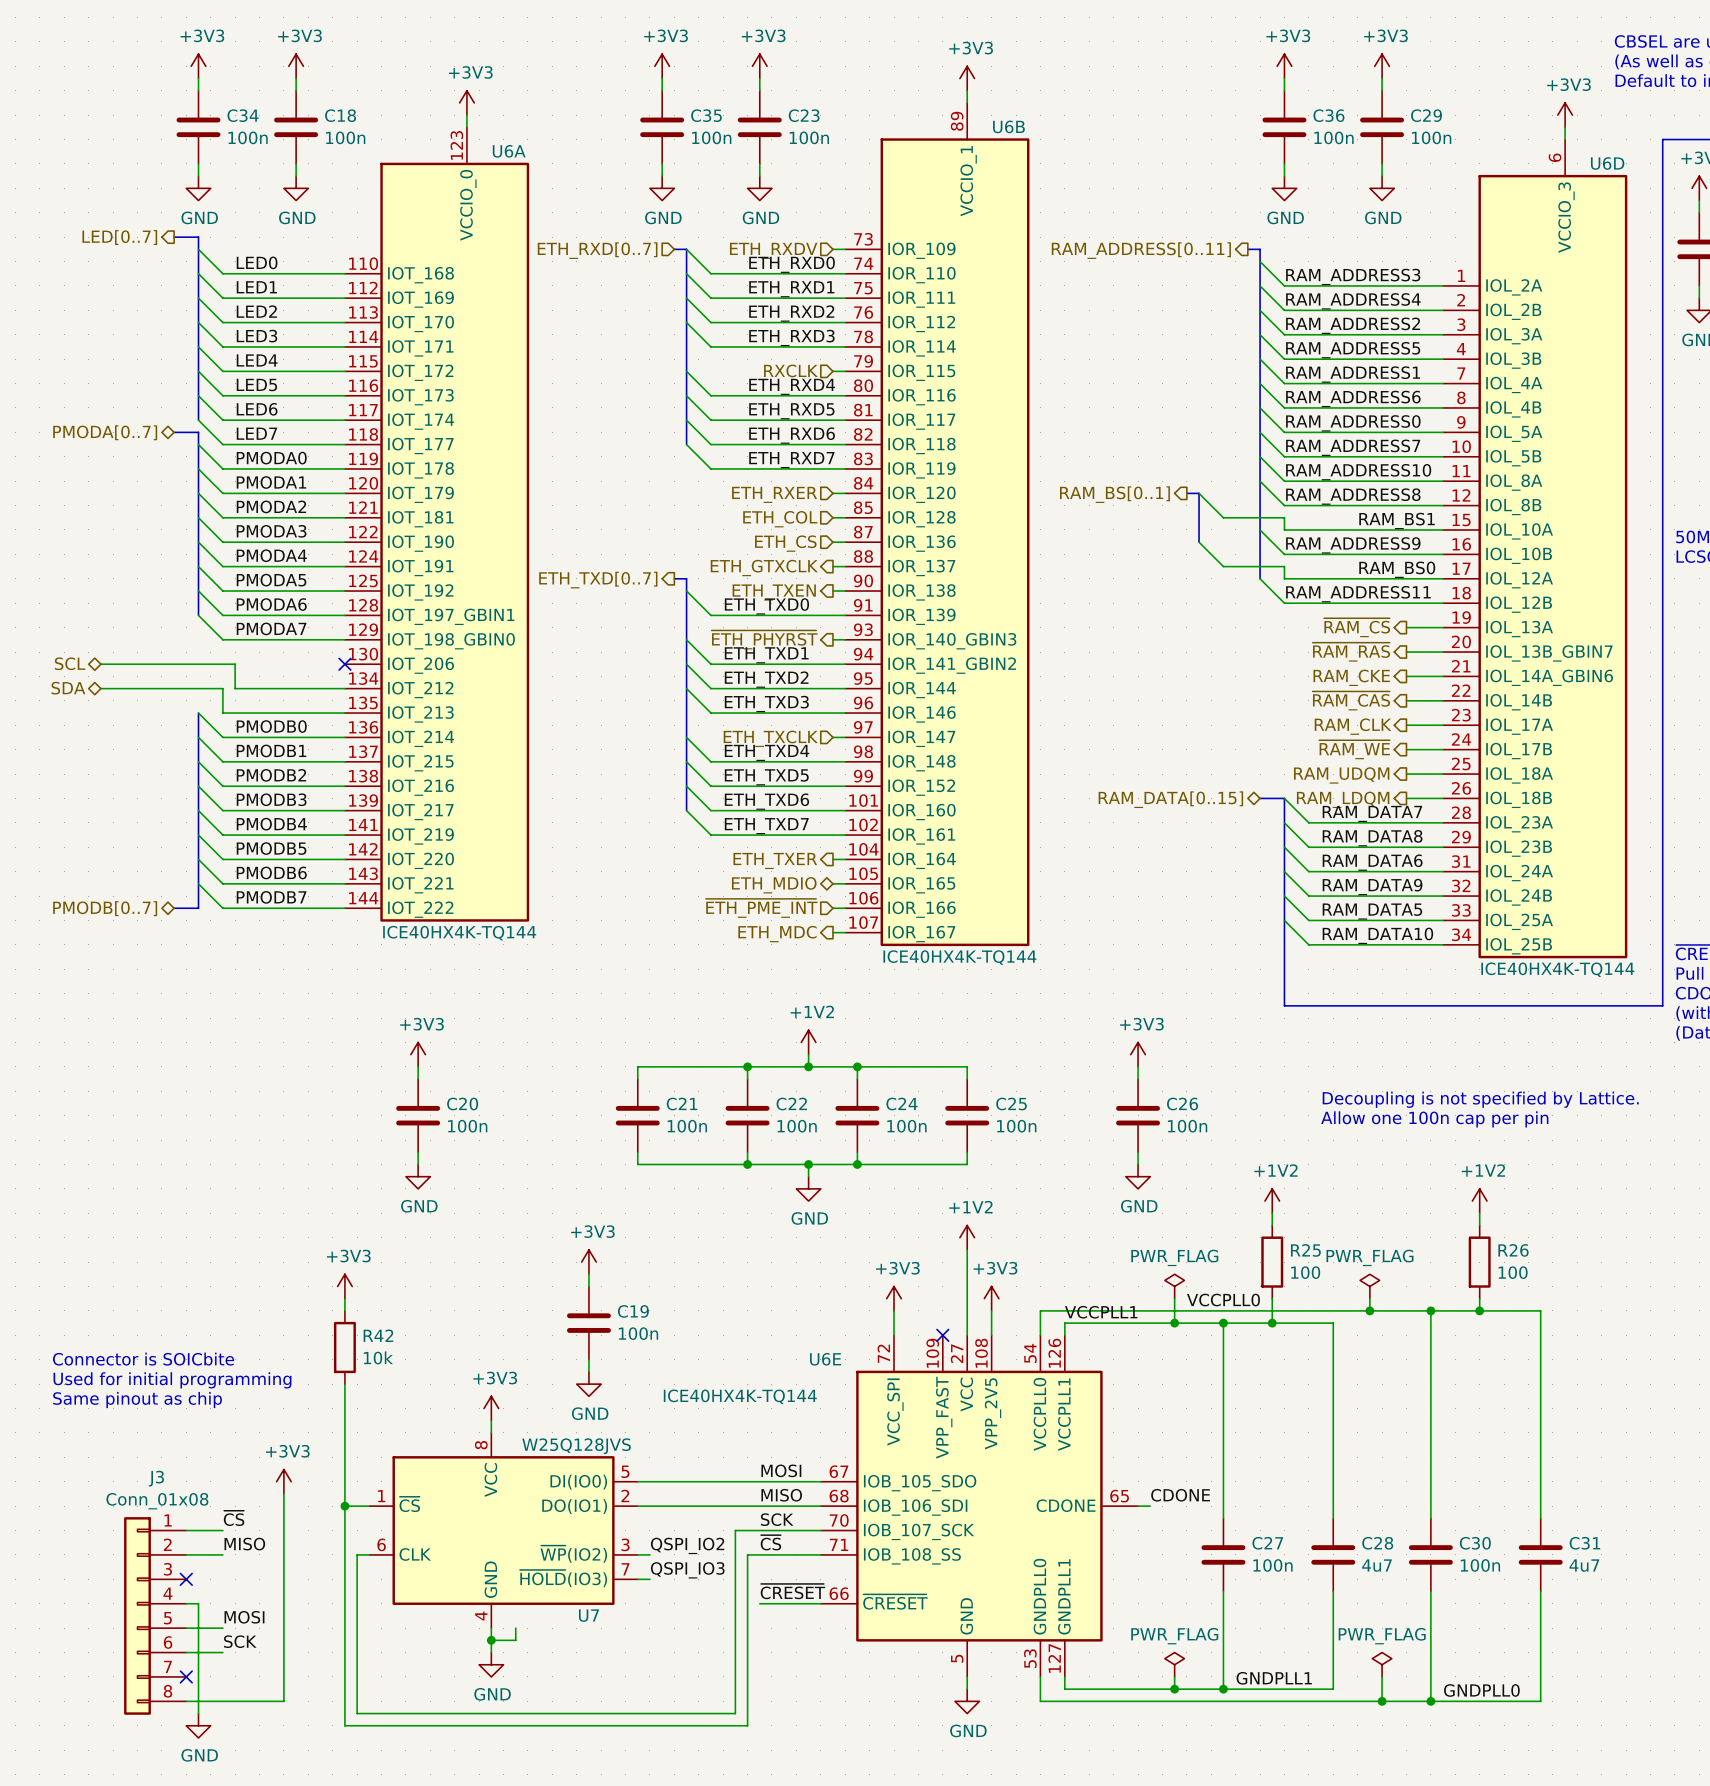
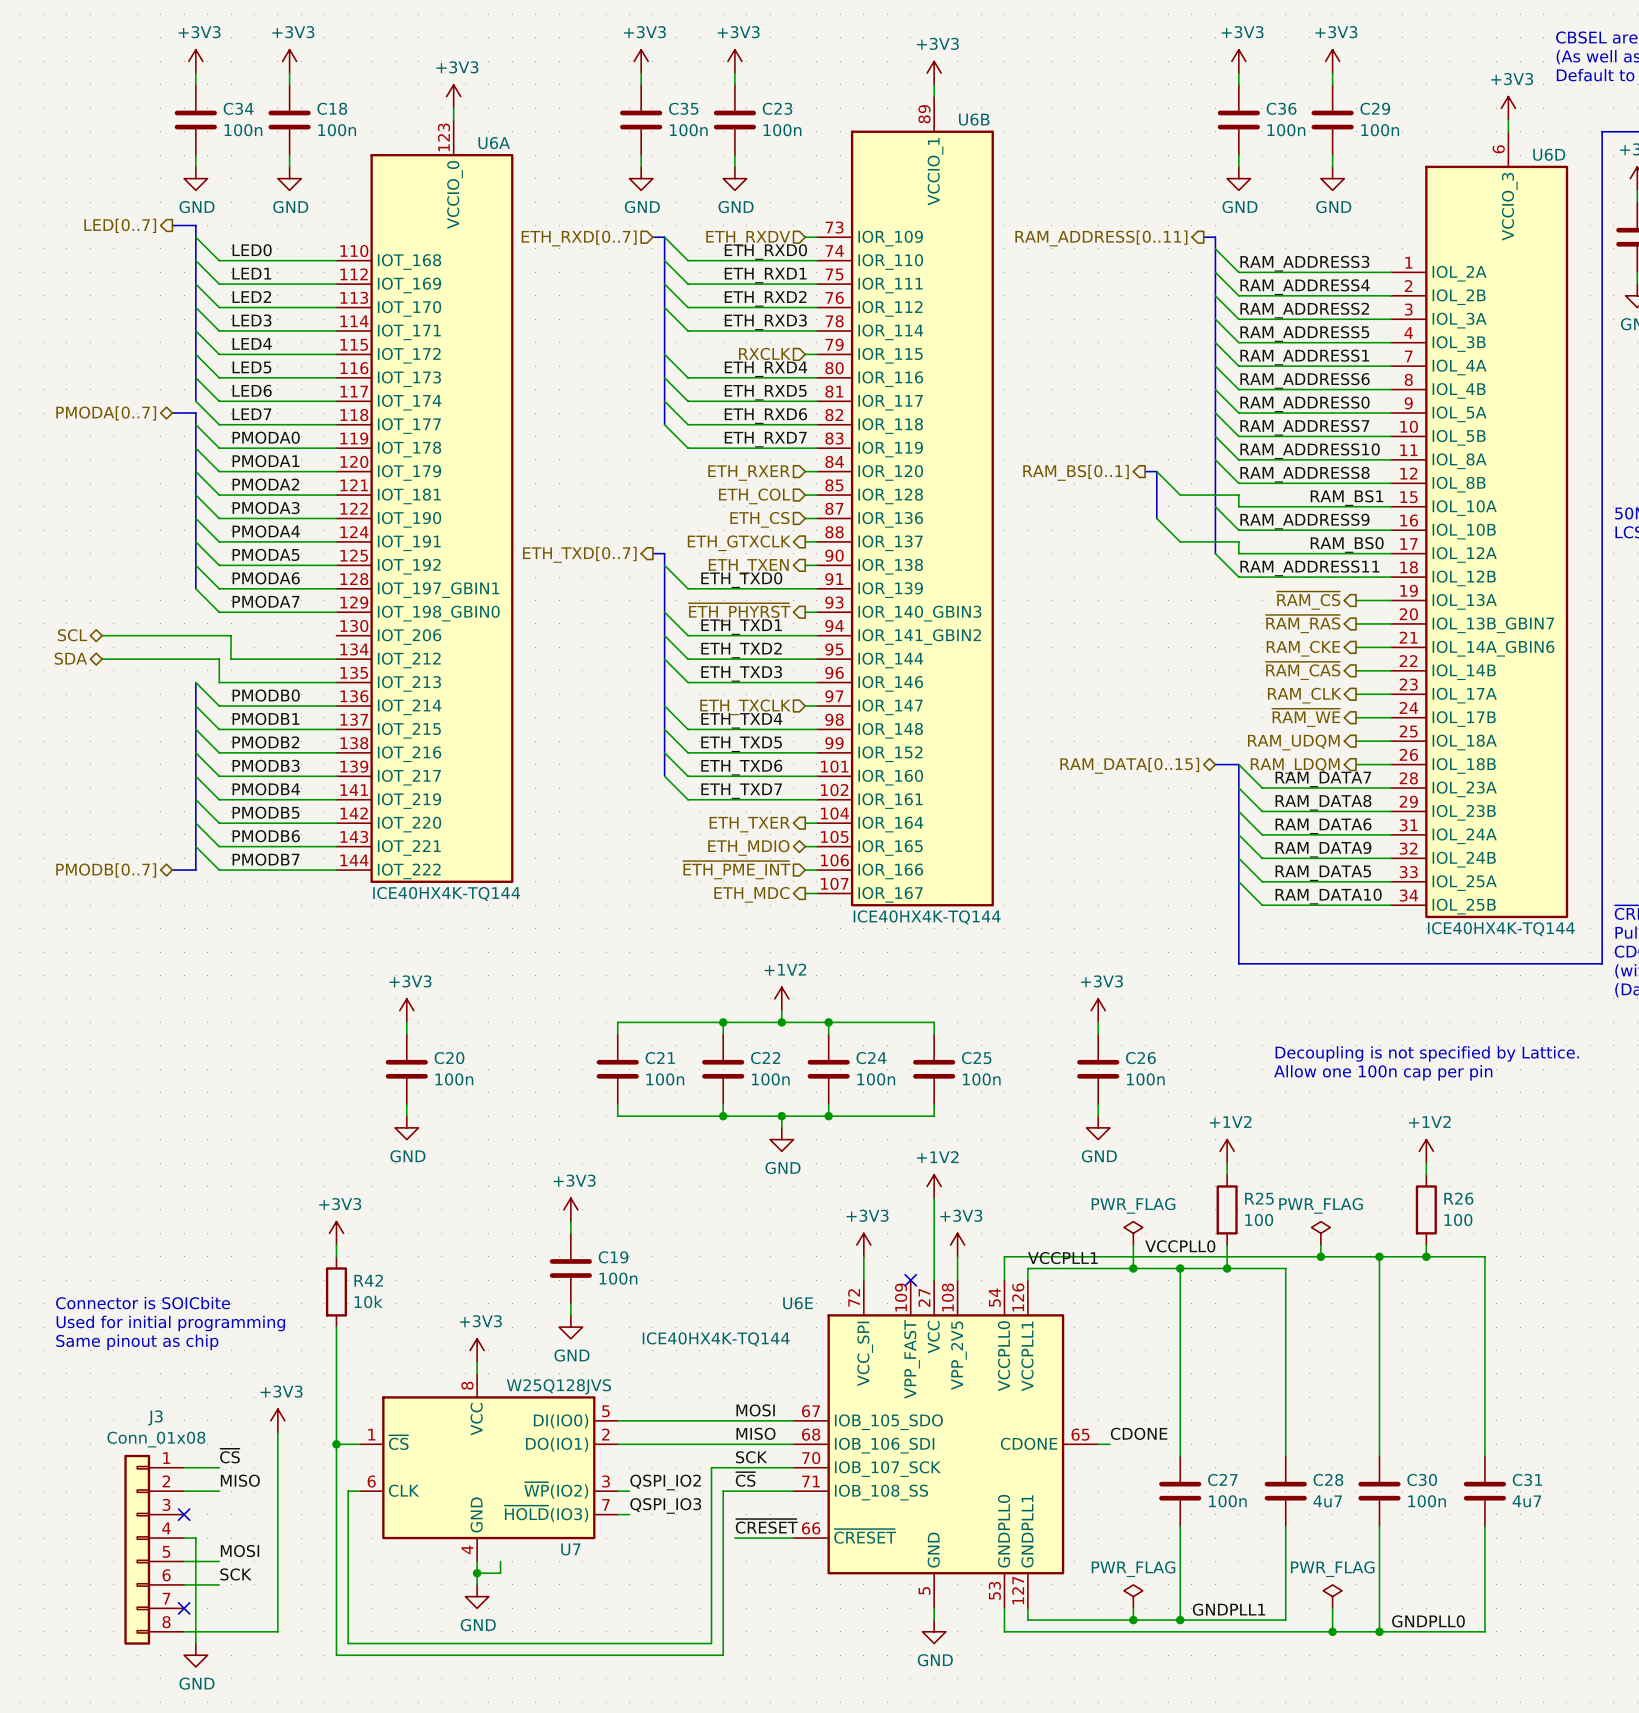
no-connect mark: (344, 664) -> none

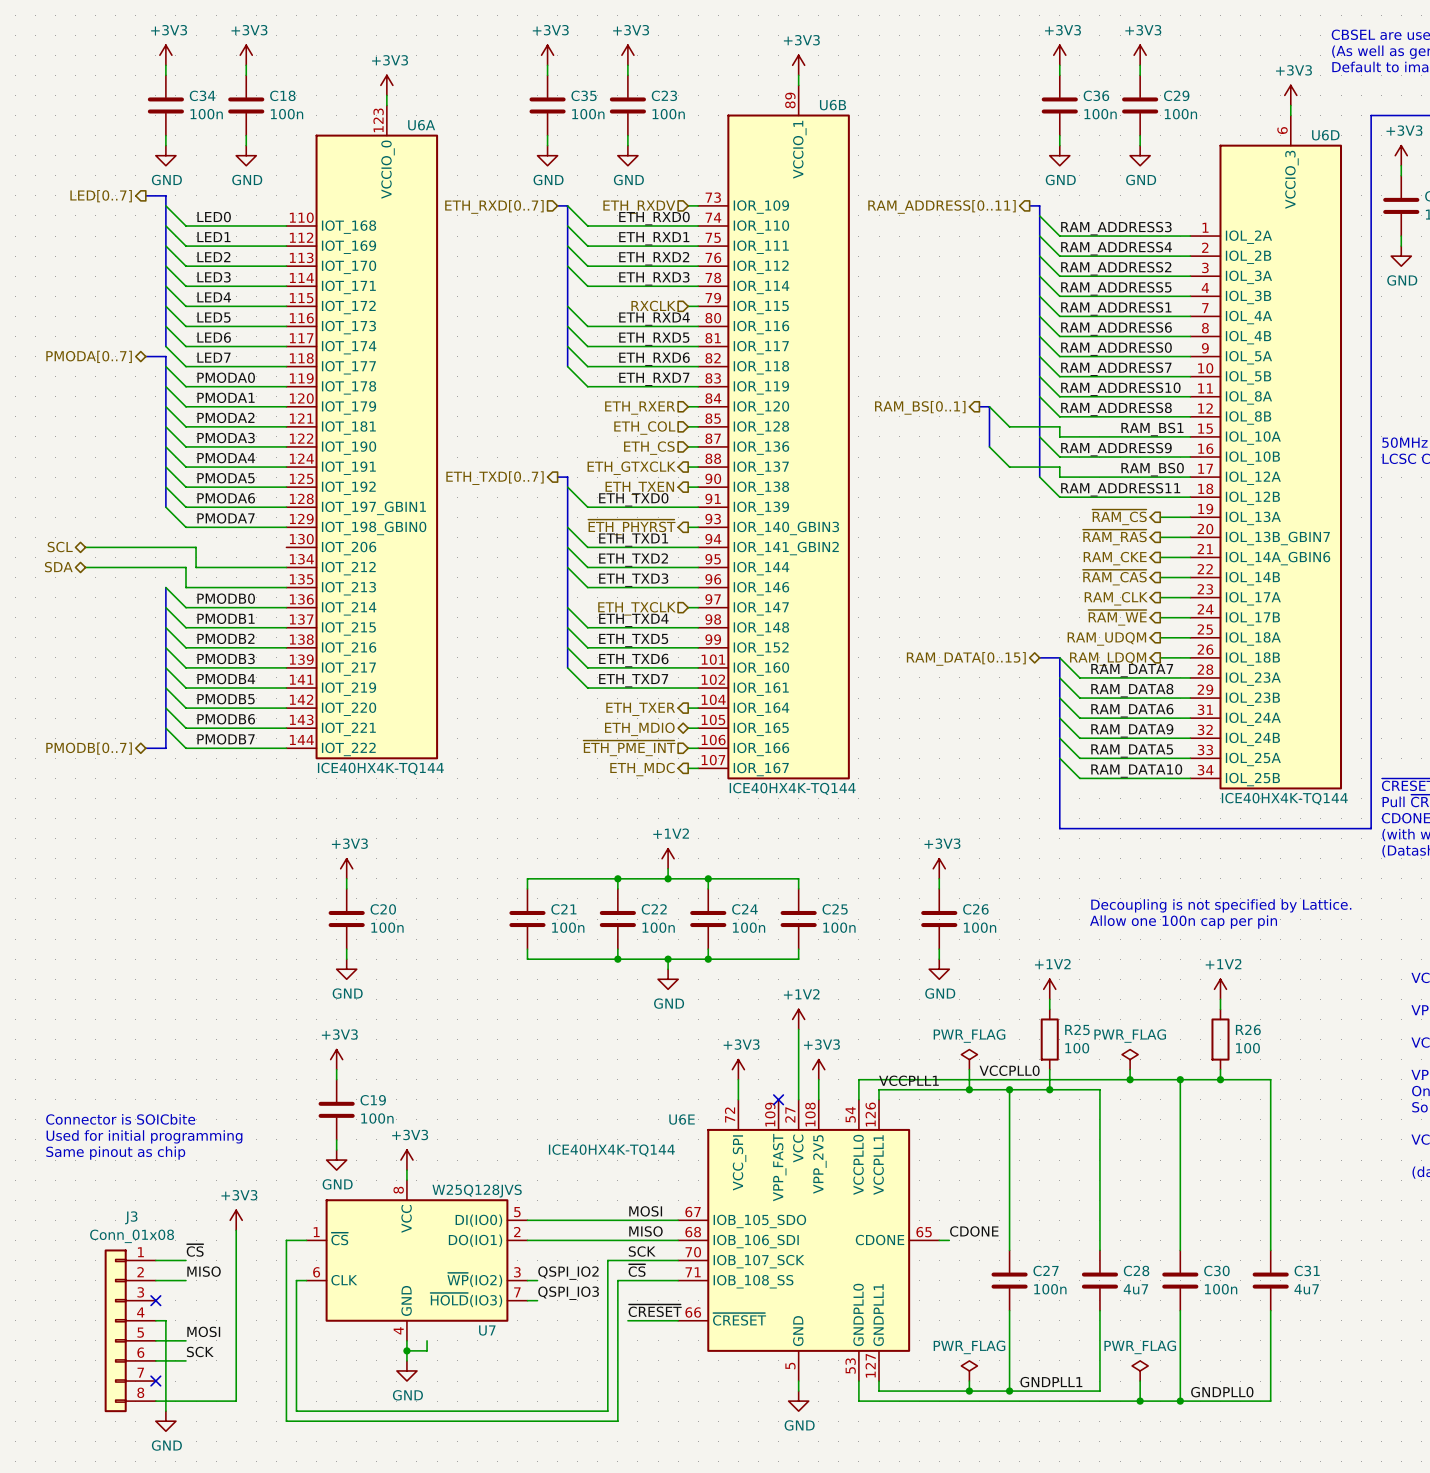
power symbol: +3V3 (570, 1209) -> none
wire: (570, 1221) (570, 1233) -> none
power symbol position: +3V3 (336, 1233) -> +3V3 (336, 1059)
wire: (336, 1245) (336, 1256) -> (336, 1069) (336, 1079)
C19 position: (570, 1268) -> (336, 1109)
R42: 10k (336, 1291) -> none
wire: (570, 1303) (570, 1315) -> (336, 1139) (336, 1150)
wire: (336, 1327) (336, 1444) -> none
power symbol position: GND (570, 1327) -> GND (336, 1160)
junction: (336, 1444) -> none

